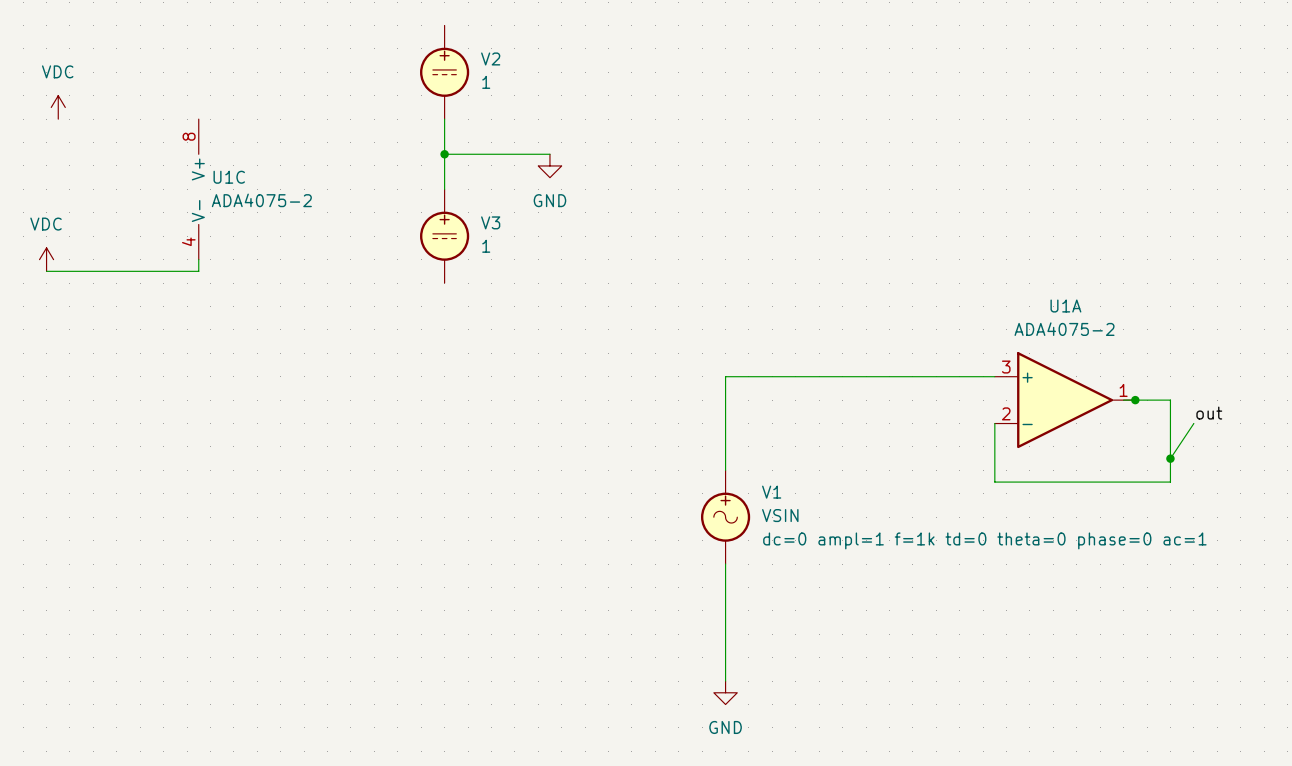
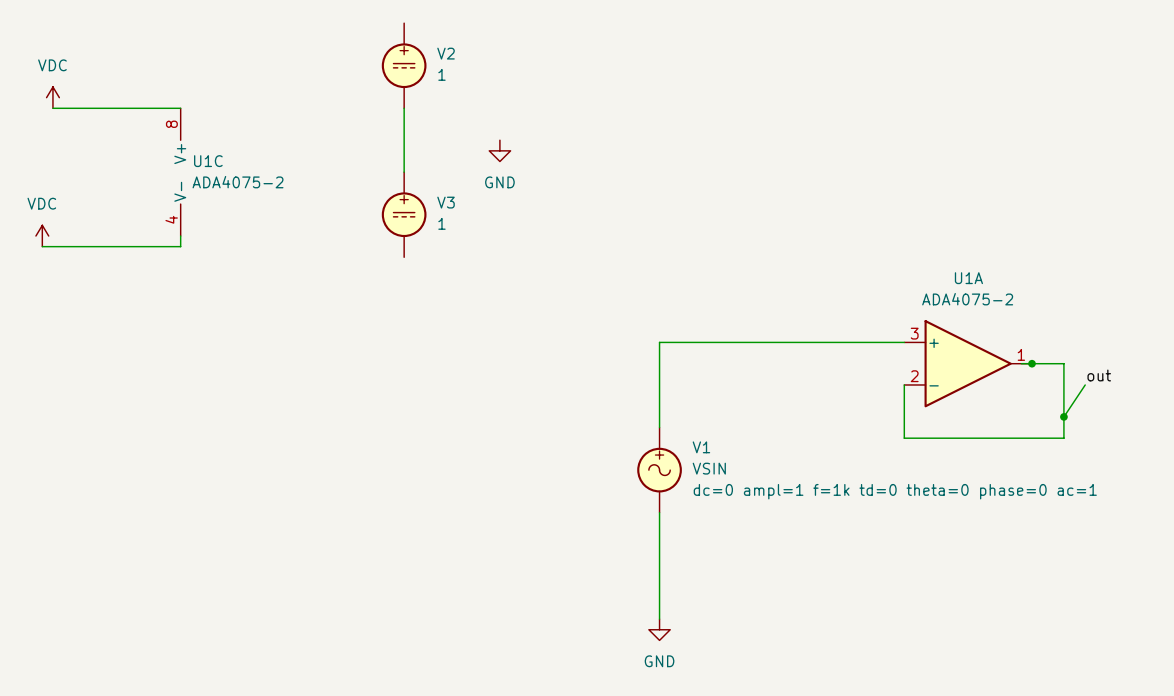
wire: none -> (52, 108) (180, 108)
wire: (444, 154) (549, 154) -> none
junction: (444, 154) -> none

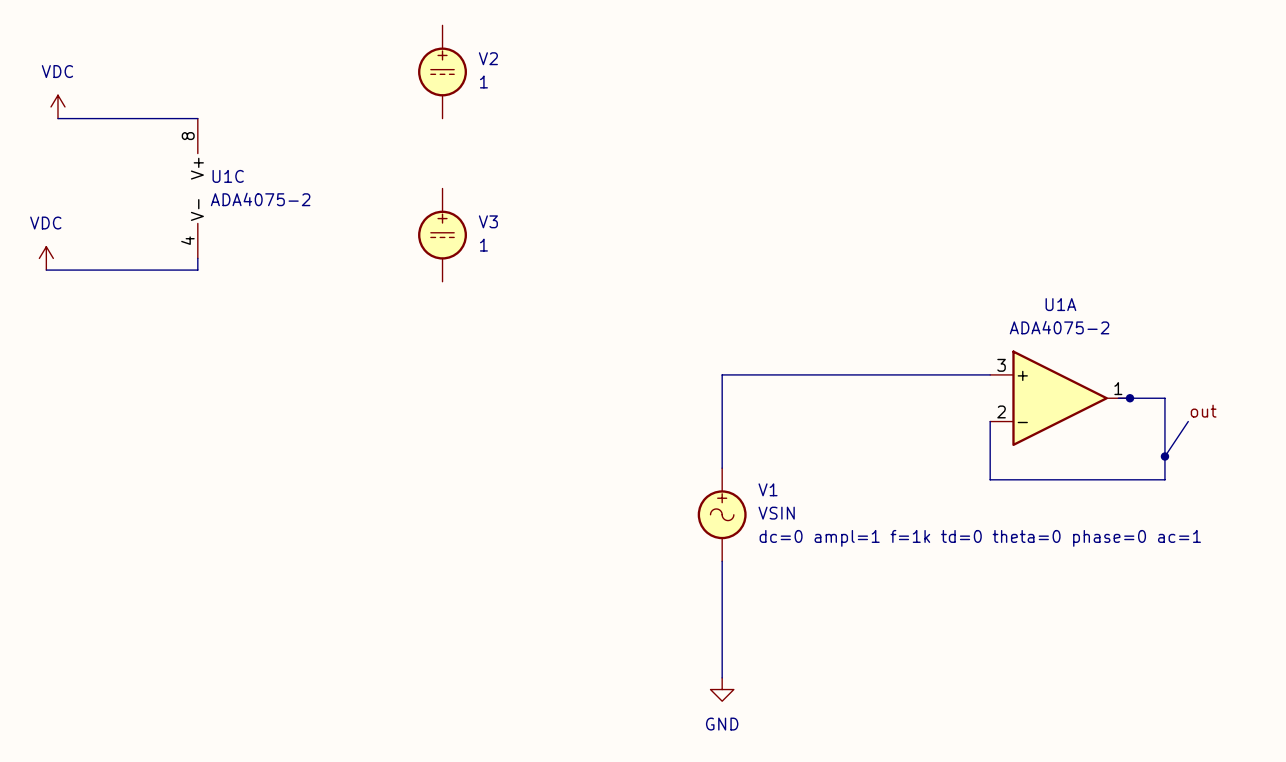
wire: (404, 108) (404, 172) -> none
power symbol: GND (499, 150) -> none

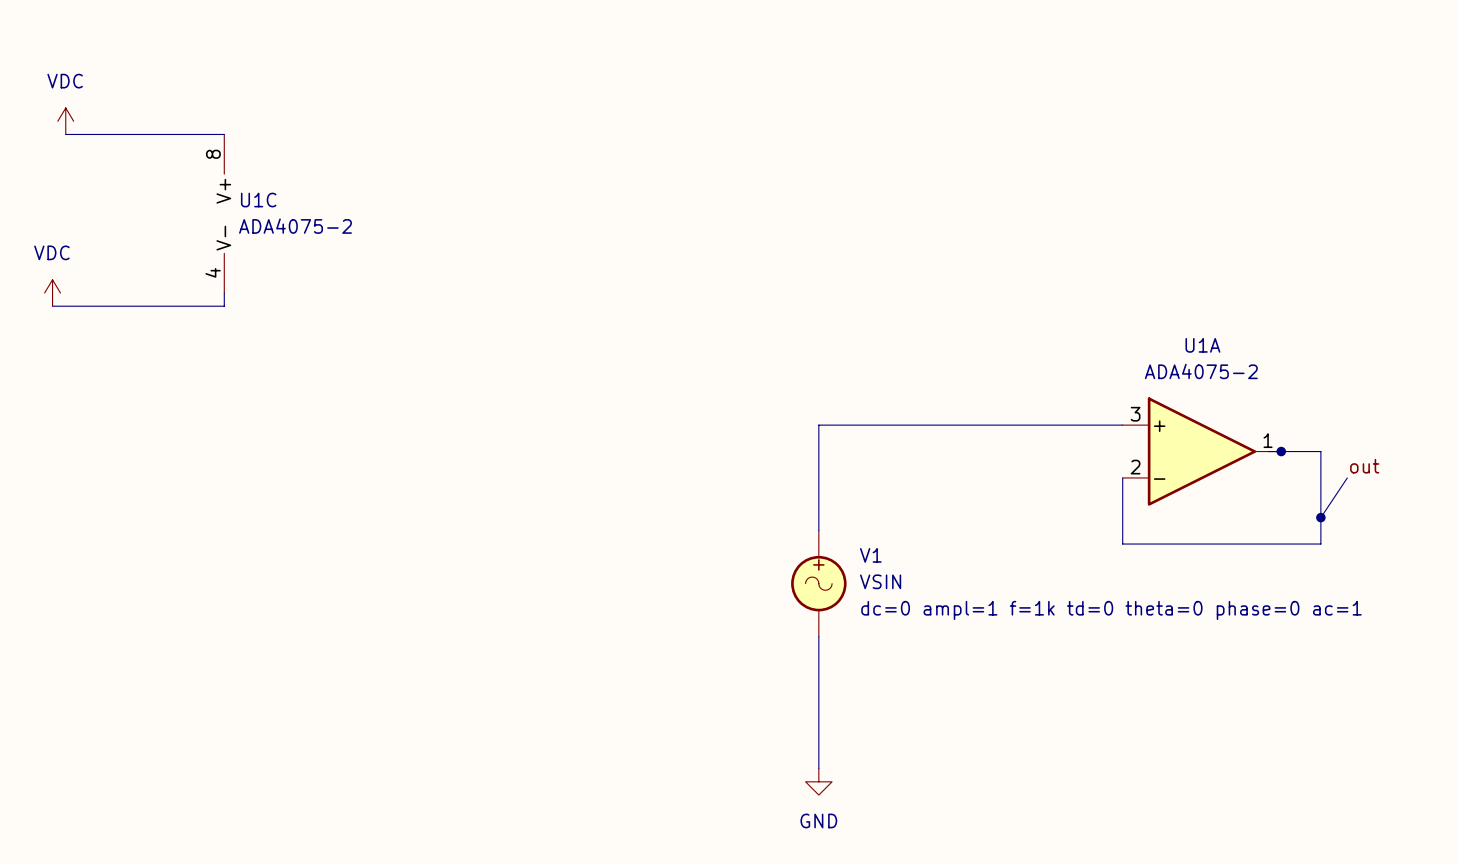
V2: 1 (442, 71) -> none
V3: 1 (442, 235) -> none

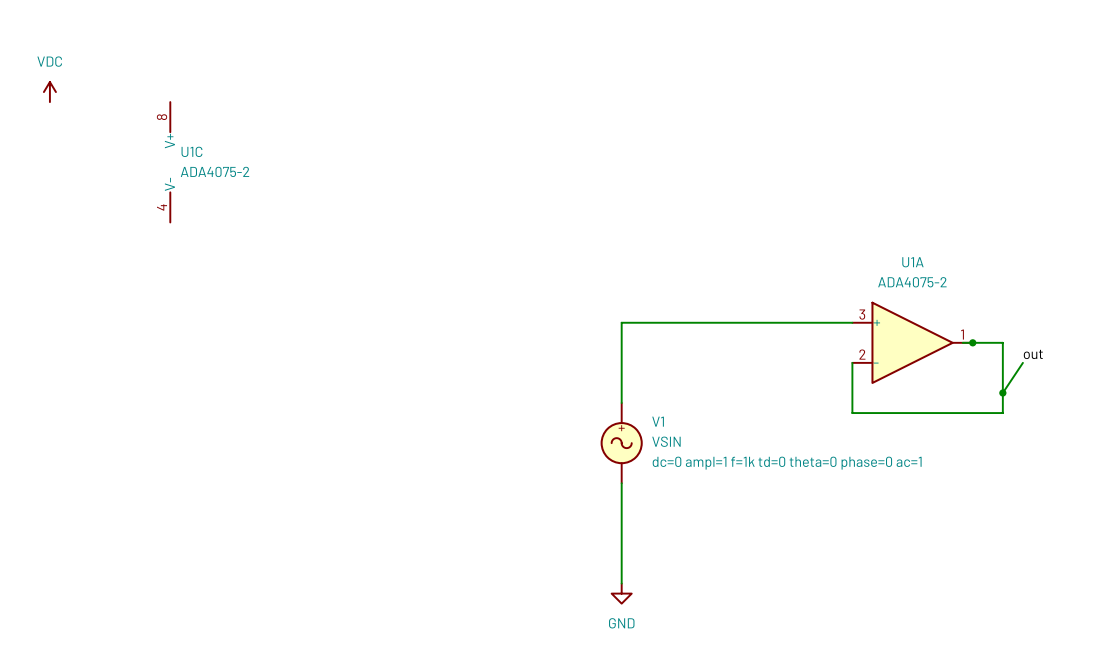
wire: (65, 134) (224, 134) -> none
power symbol: VDC (52, 293) -> none
wire: (224, 293) (224, 306) (52, 306) -> none

